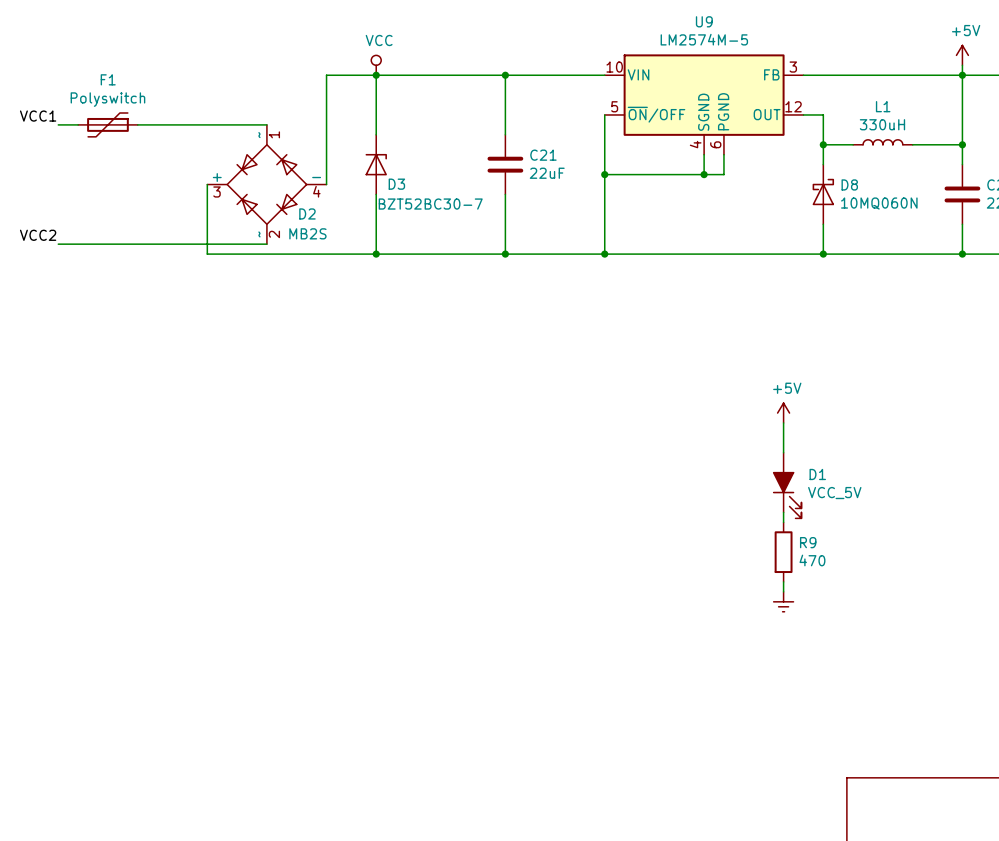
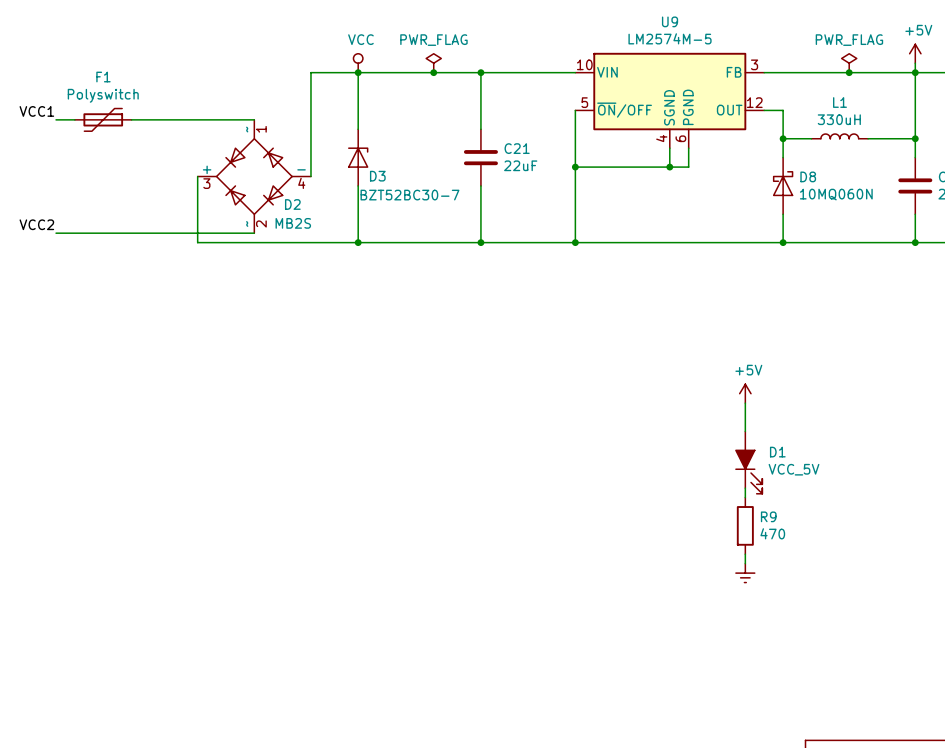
power symbol: none -> PWR_FLAG (433, 63)
power symbol: none -> PWR_FLAG (849, 63)
junction: none -> (433, 72)
junction: none -> (849, 72)

